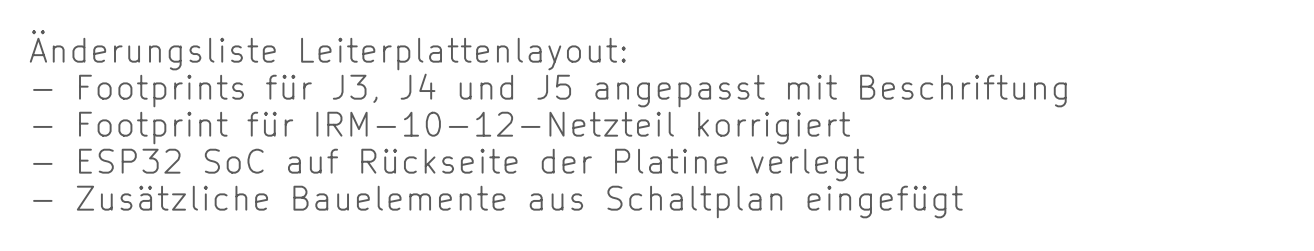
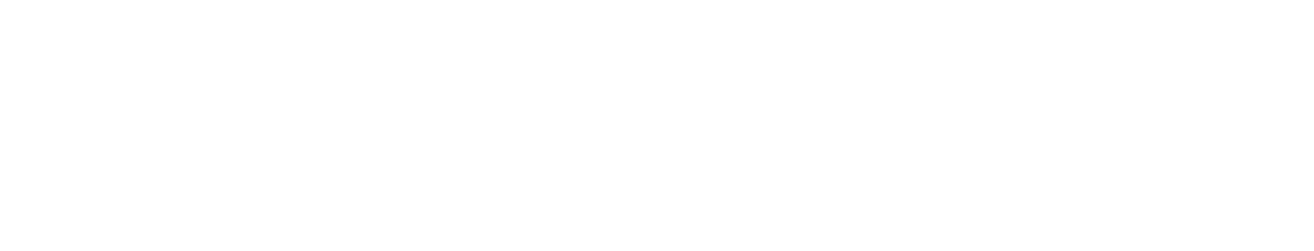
text: Änderungsliste Leiterplattenlayout: (327, 50) -> none
text: - Footprints für J3, J4 und J5 angepasst mit Beschriftung (549, 90) -> none
text: - Footprint für IRM-10-12-Netzteil korrigiert (441, 128) -> none
text: - ESP32 SoC auf Rückseite der Platine verlegt (448, 165) -> none
text: - Zusätzliche Bauelemente aus Schaltplan eingefügt (497, 202) -> none

